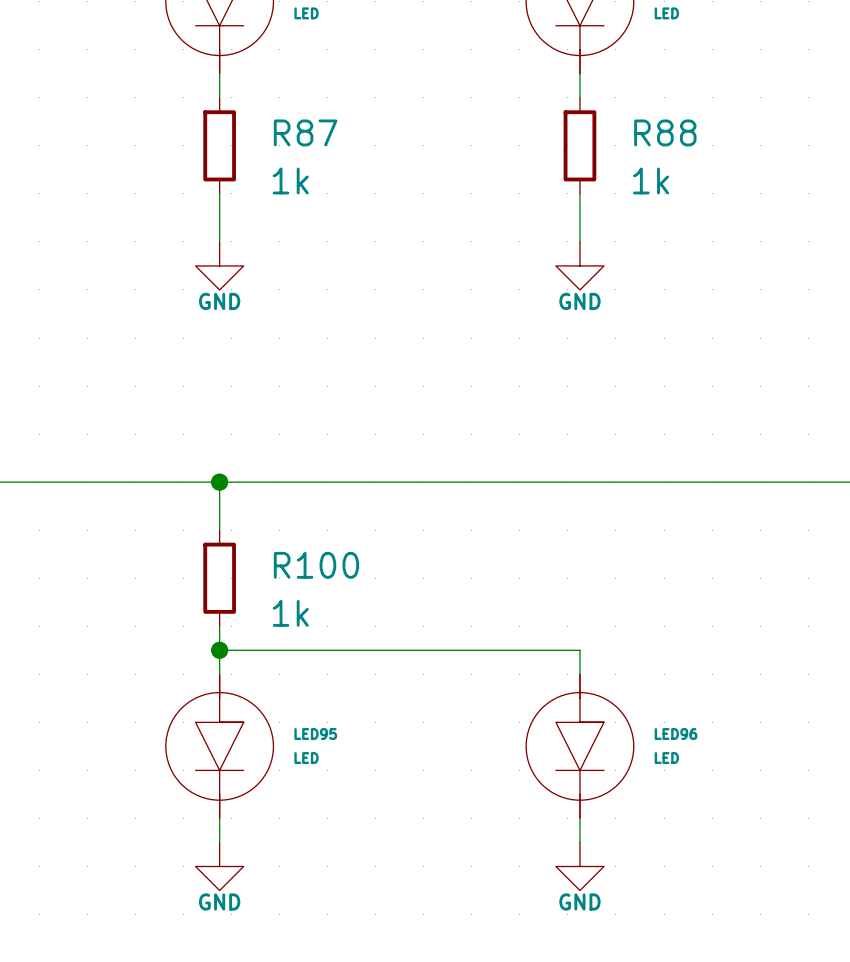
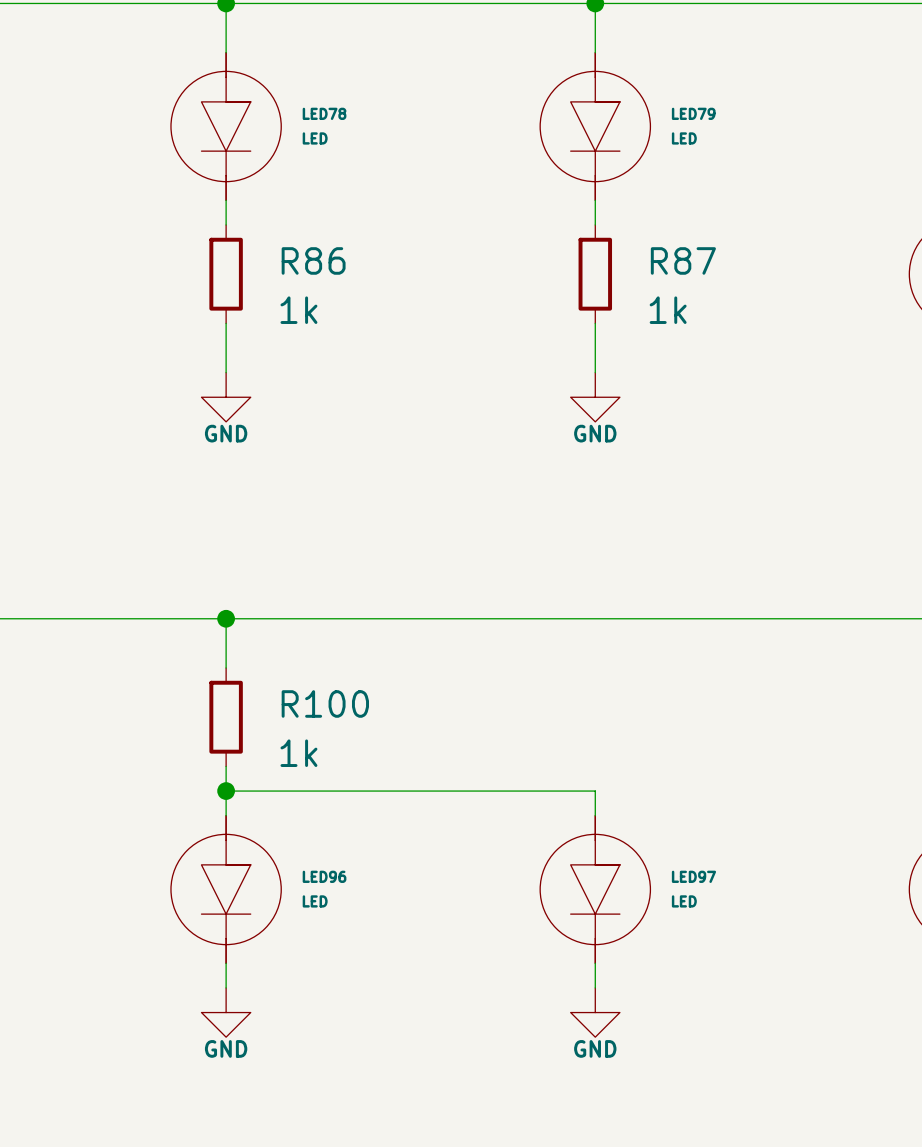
R87 name: R87 (305, 132) -> R86 (313, 260)
R88 name: R88 (665, 132) -> R87 (683, 260)
LED95 name: LED95 (315, 734) -> LED96 (324, 876)
LED96 name: LED96 (676, 734) -> LED97 (693, 876)

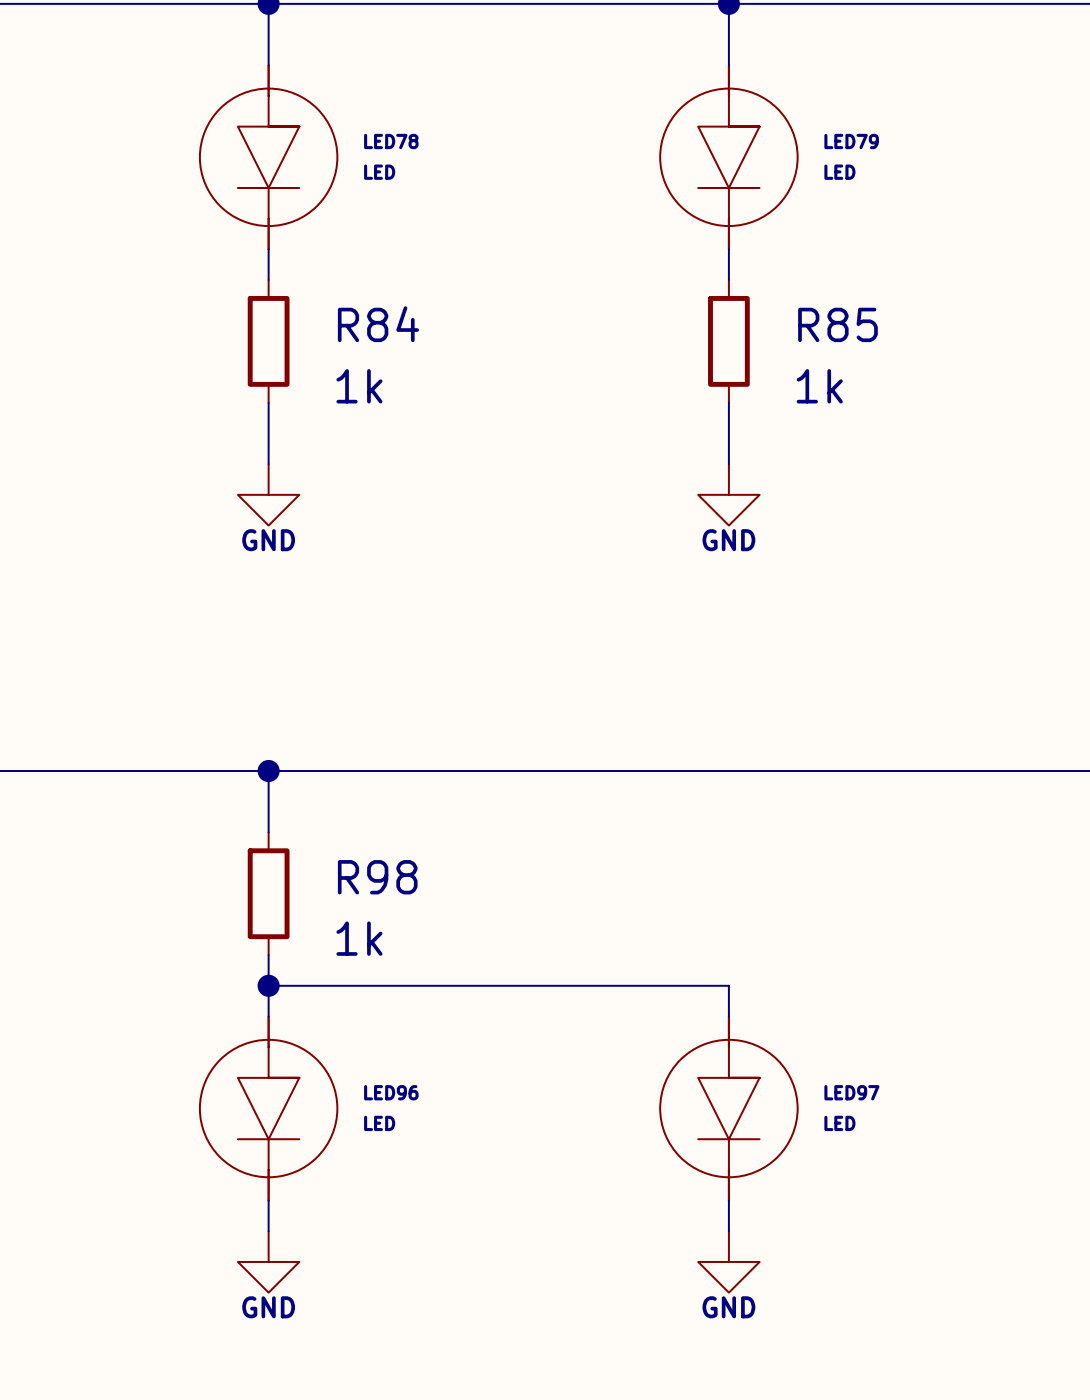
R86 name: R86 (313, 260) -> R84 (378, 324)
R87 name: R87 (683, 260) -> R85 (837, 324)
R100 name: R100 (325, 703) -> R98 (377, 877)

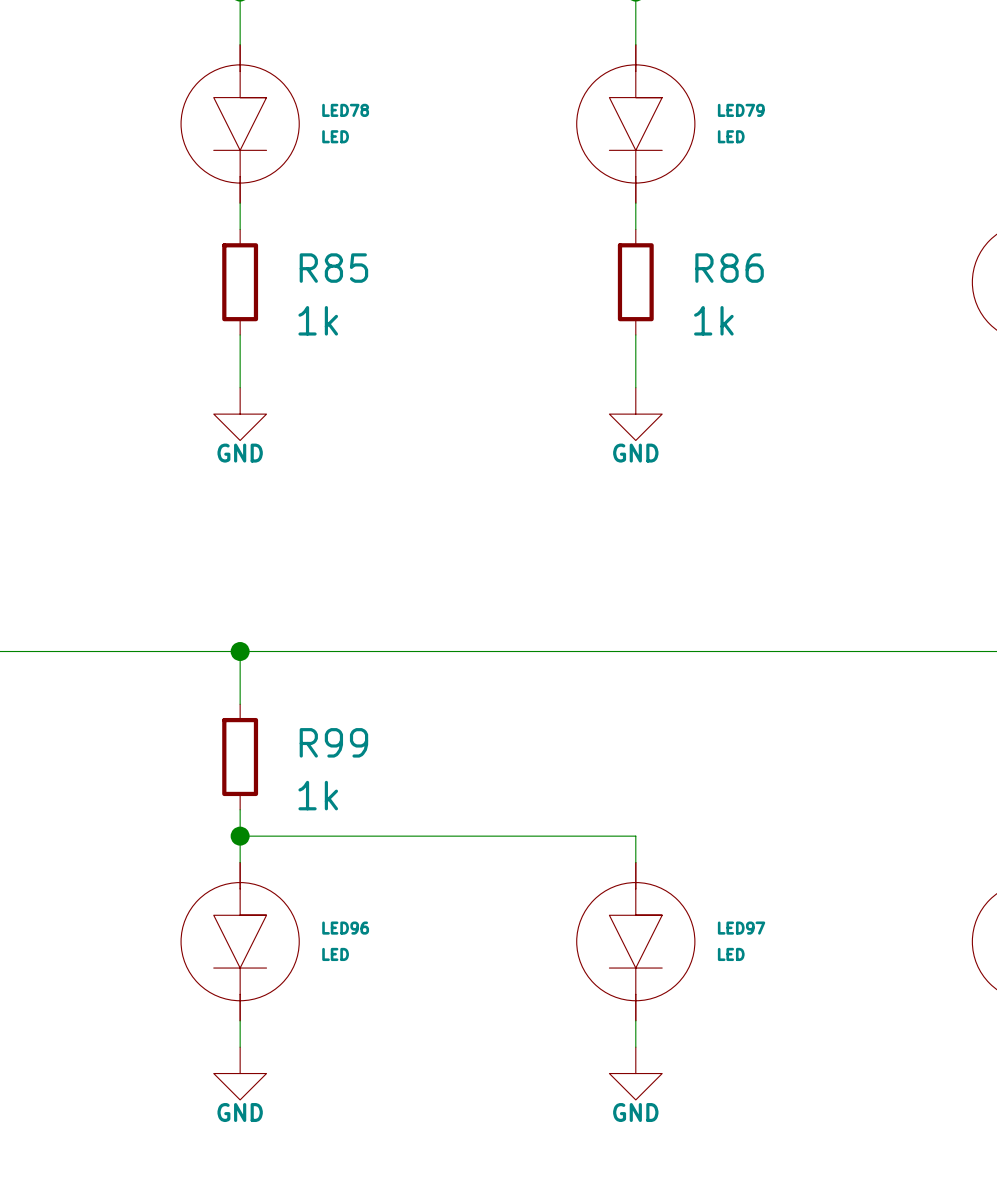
R84 name: R84 (378, 324) -> R85 (333, 268)
R85 name: R85 (837, 324) -> R86 (729, 268)
R98 name: R98 (377, 877) -> R99 (333, 742)

